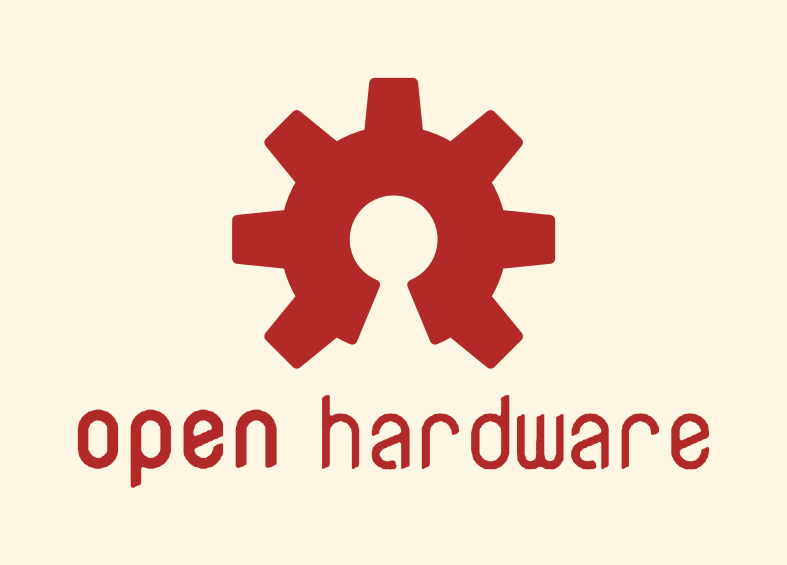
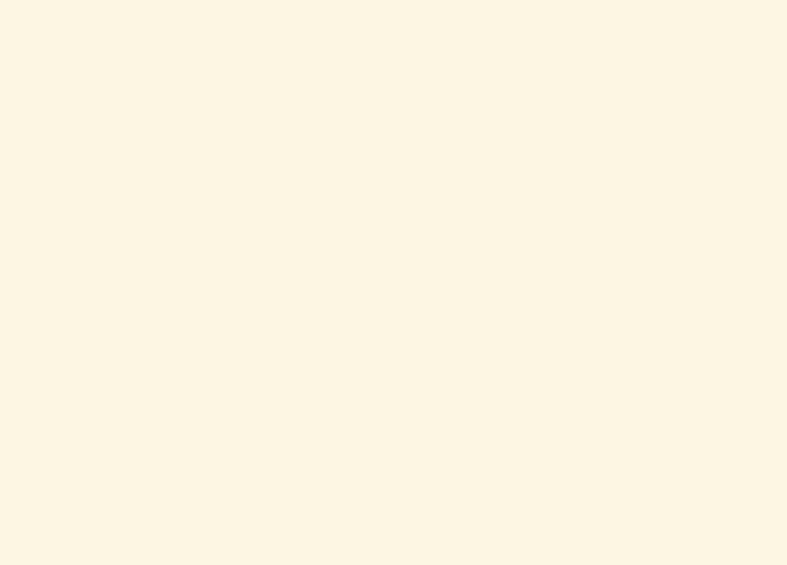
part: (393, 282) -> none

